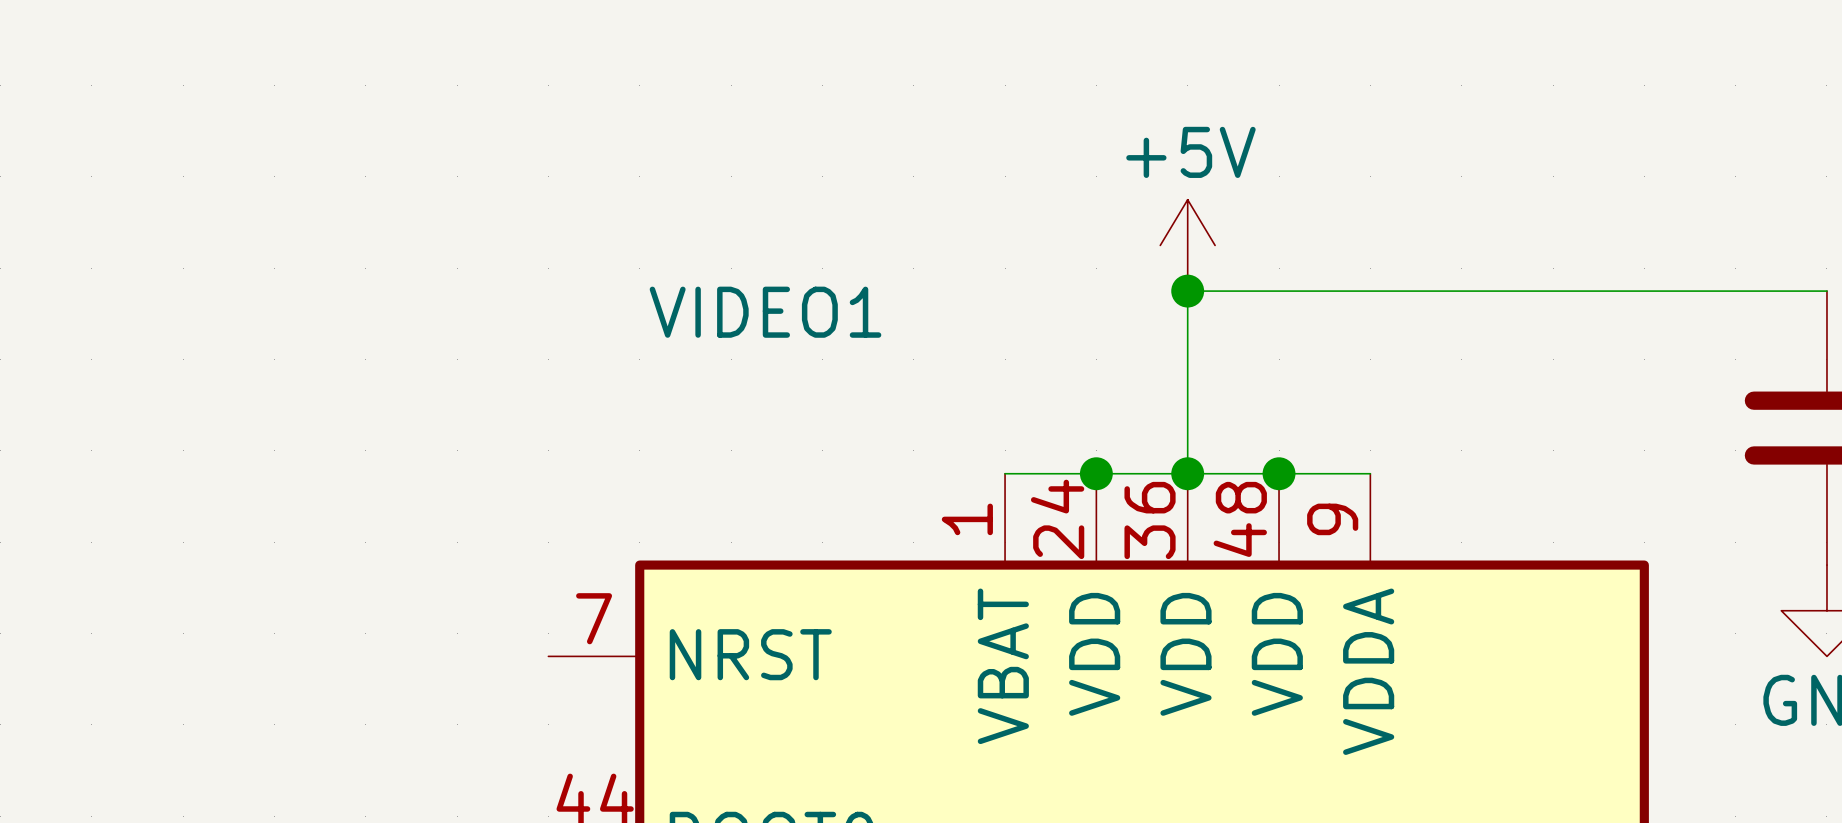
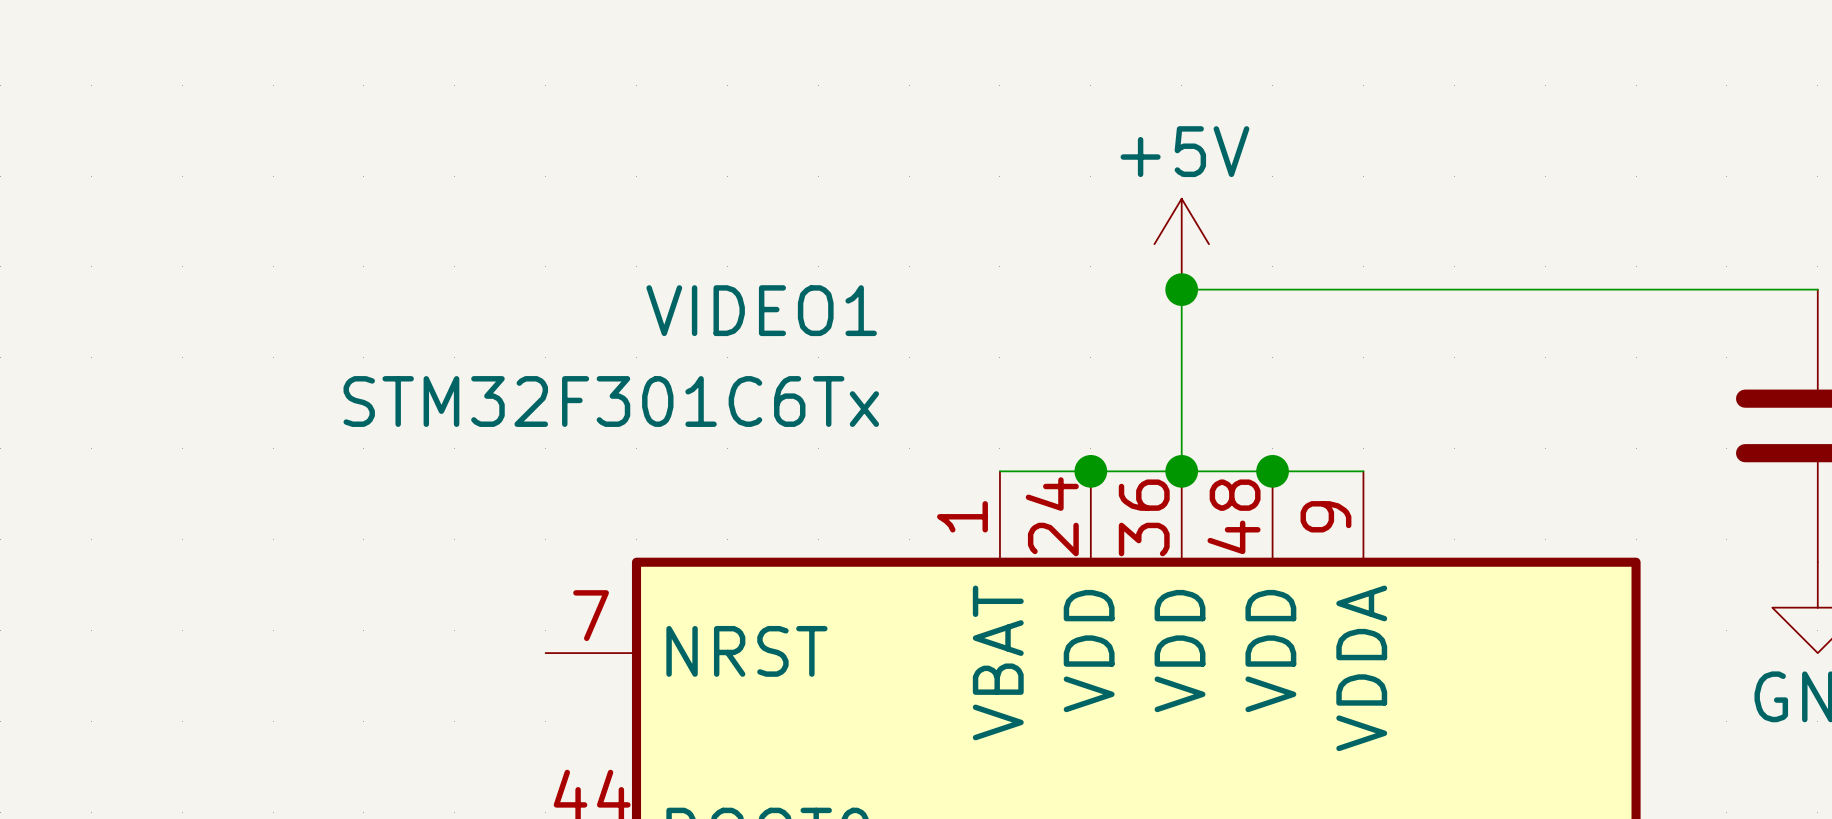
VIDEO1 value: none -> STM32F301C6Tx (611, 401)

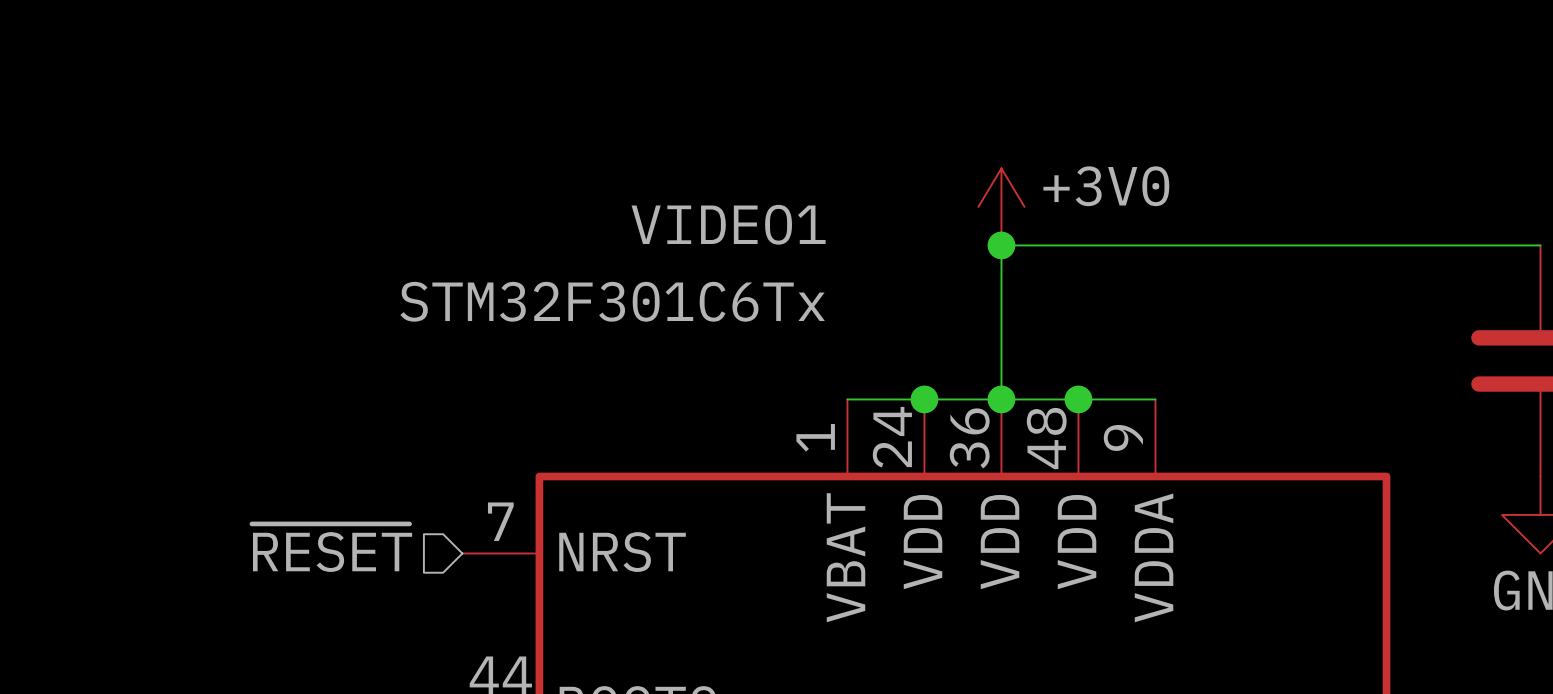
power symbol: +5V (1181, 244) -> +3V0 (1001, 206)
VIDEO1 name position: VIDEO1 (761, 310) -> VIDEO1 (728, 224)
VIDEO1 value position: STM32F301C6Tx (611, 401) -> STM32F301C6Tx (612, 301)
hierarchical label: none -> ~{RESET} (332, 547)

